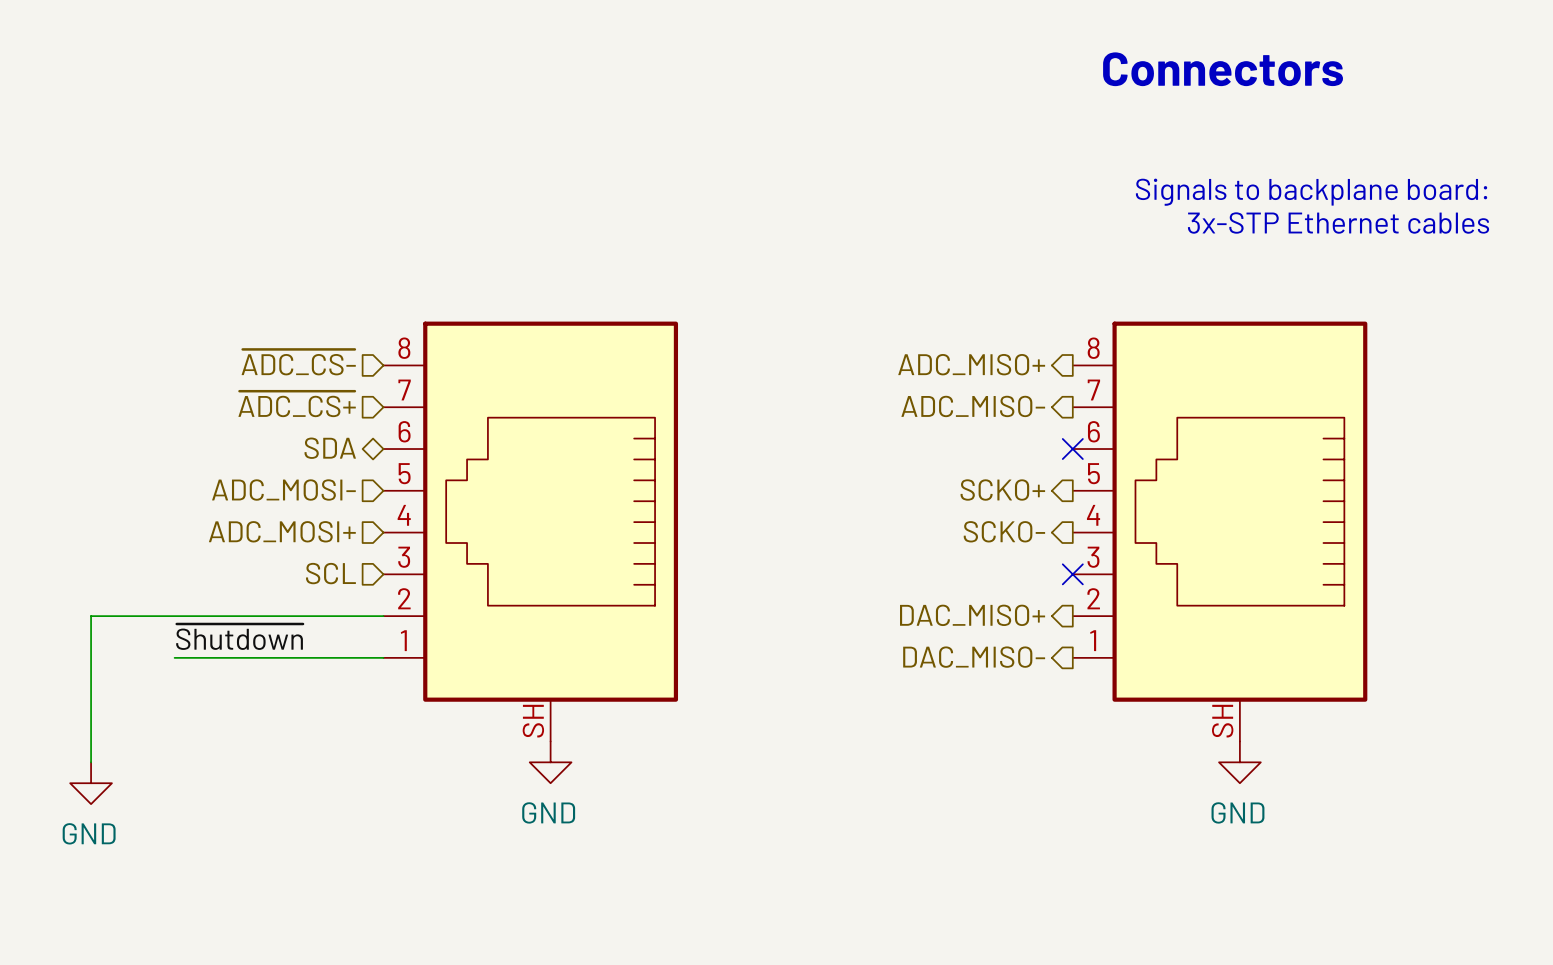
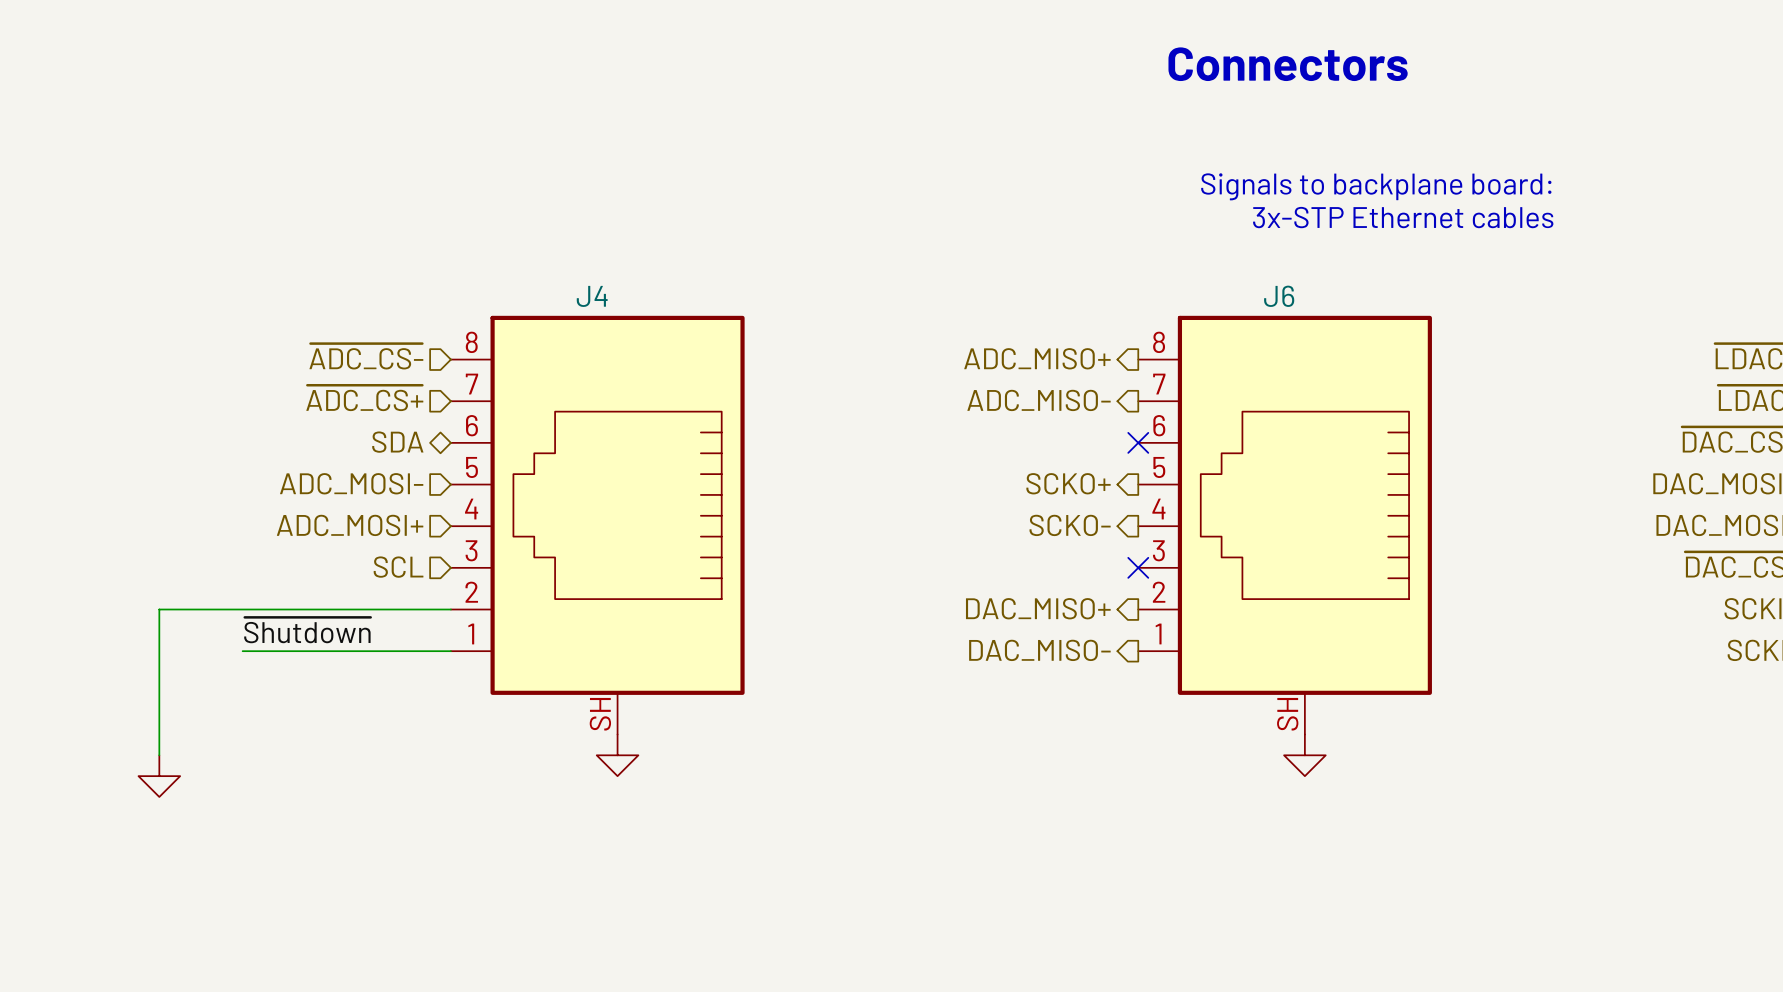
J4 name: none -> J4 (592, 296)
J6 name: none -> J6 (1279, 296)
power symbol text: GND (548, 812) -> none
power symbol text: GND (1237, 812) -> none
power symbol text: GND (89, 833) -> none

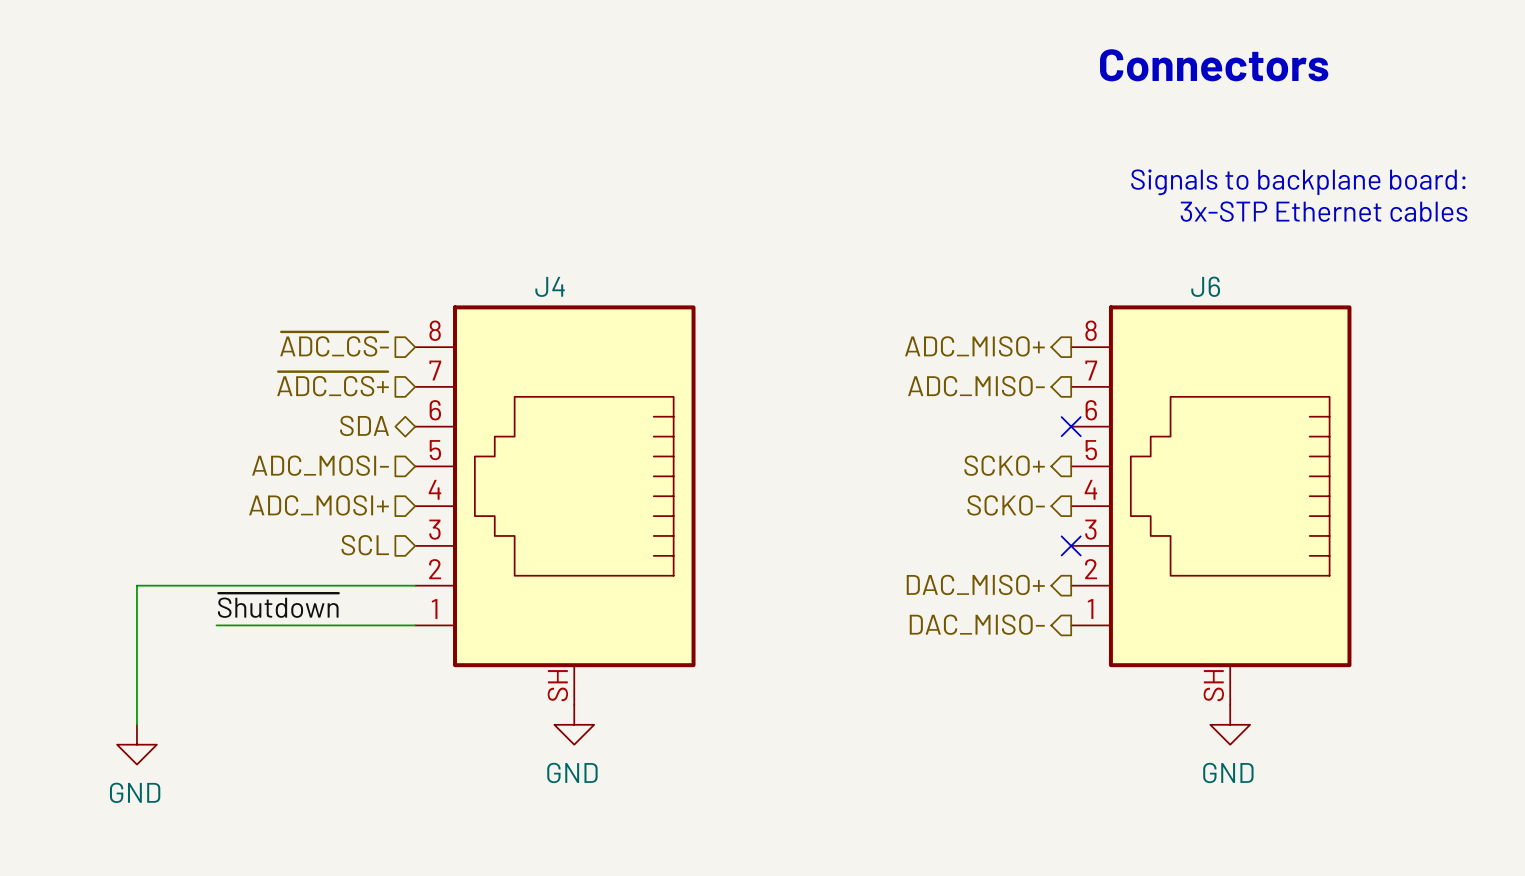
power symbol text: none -> GND (572, 772)
power symbol text: none -> GND (1228, 772)
power symbol text: none -> GND (135, 792)

